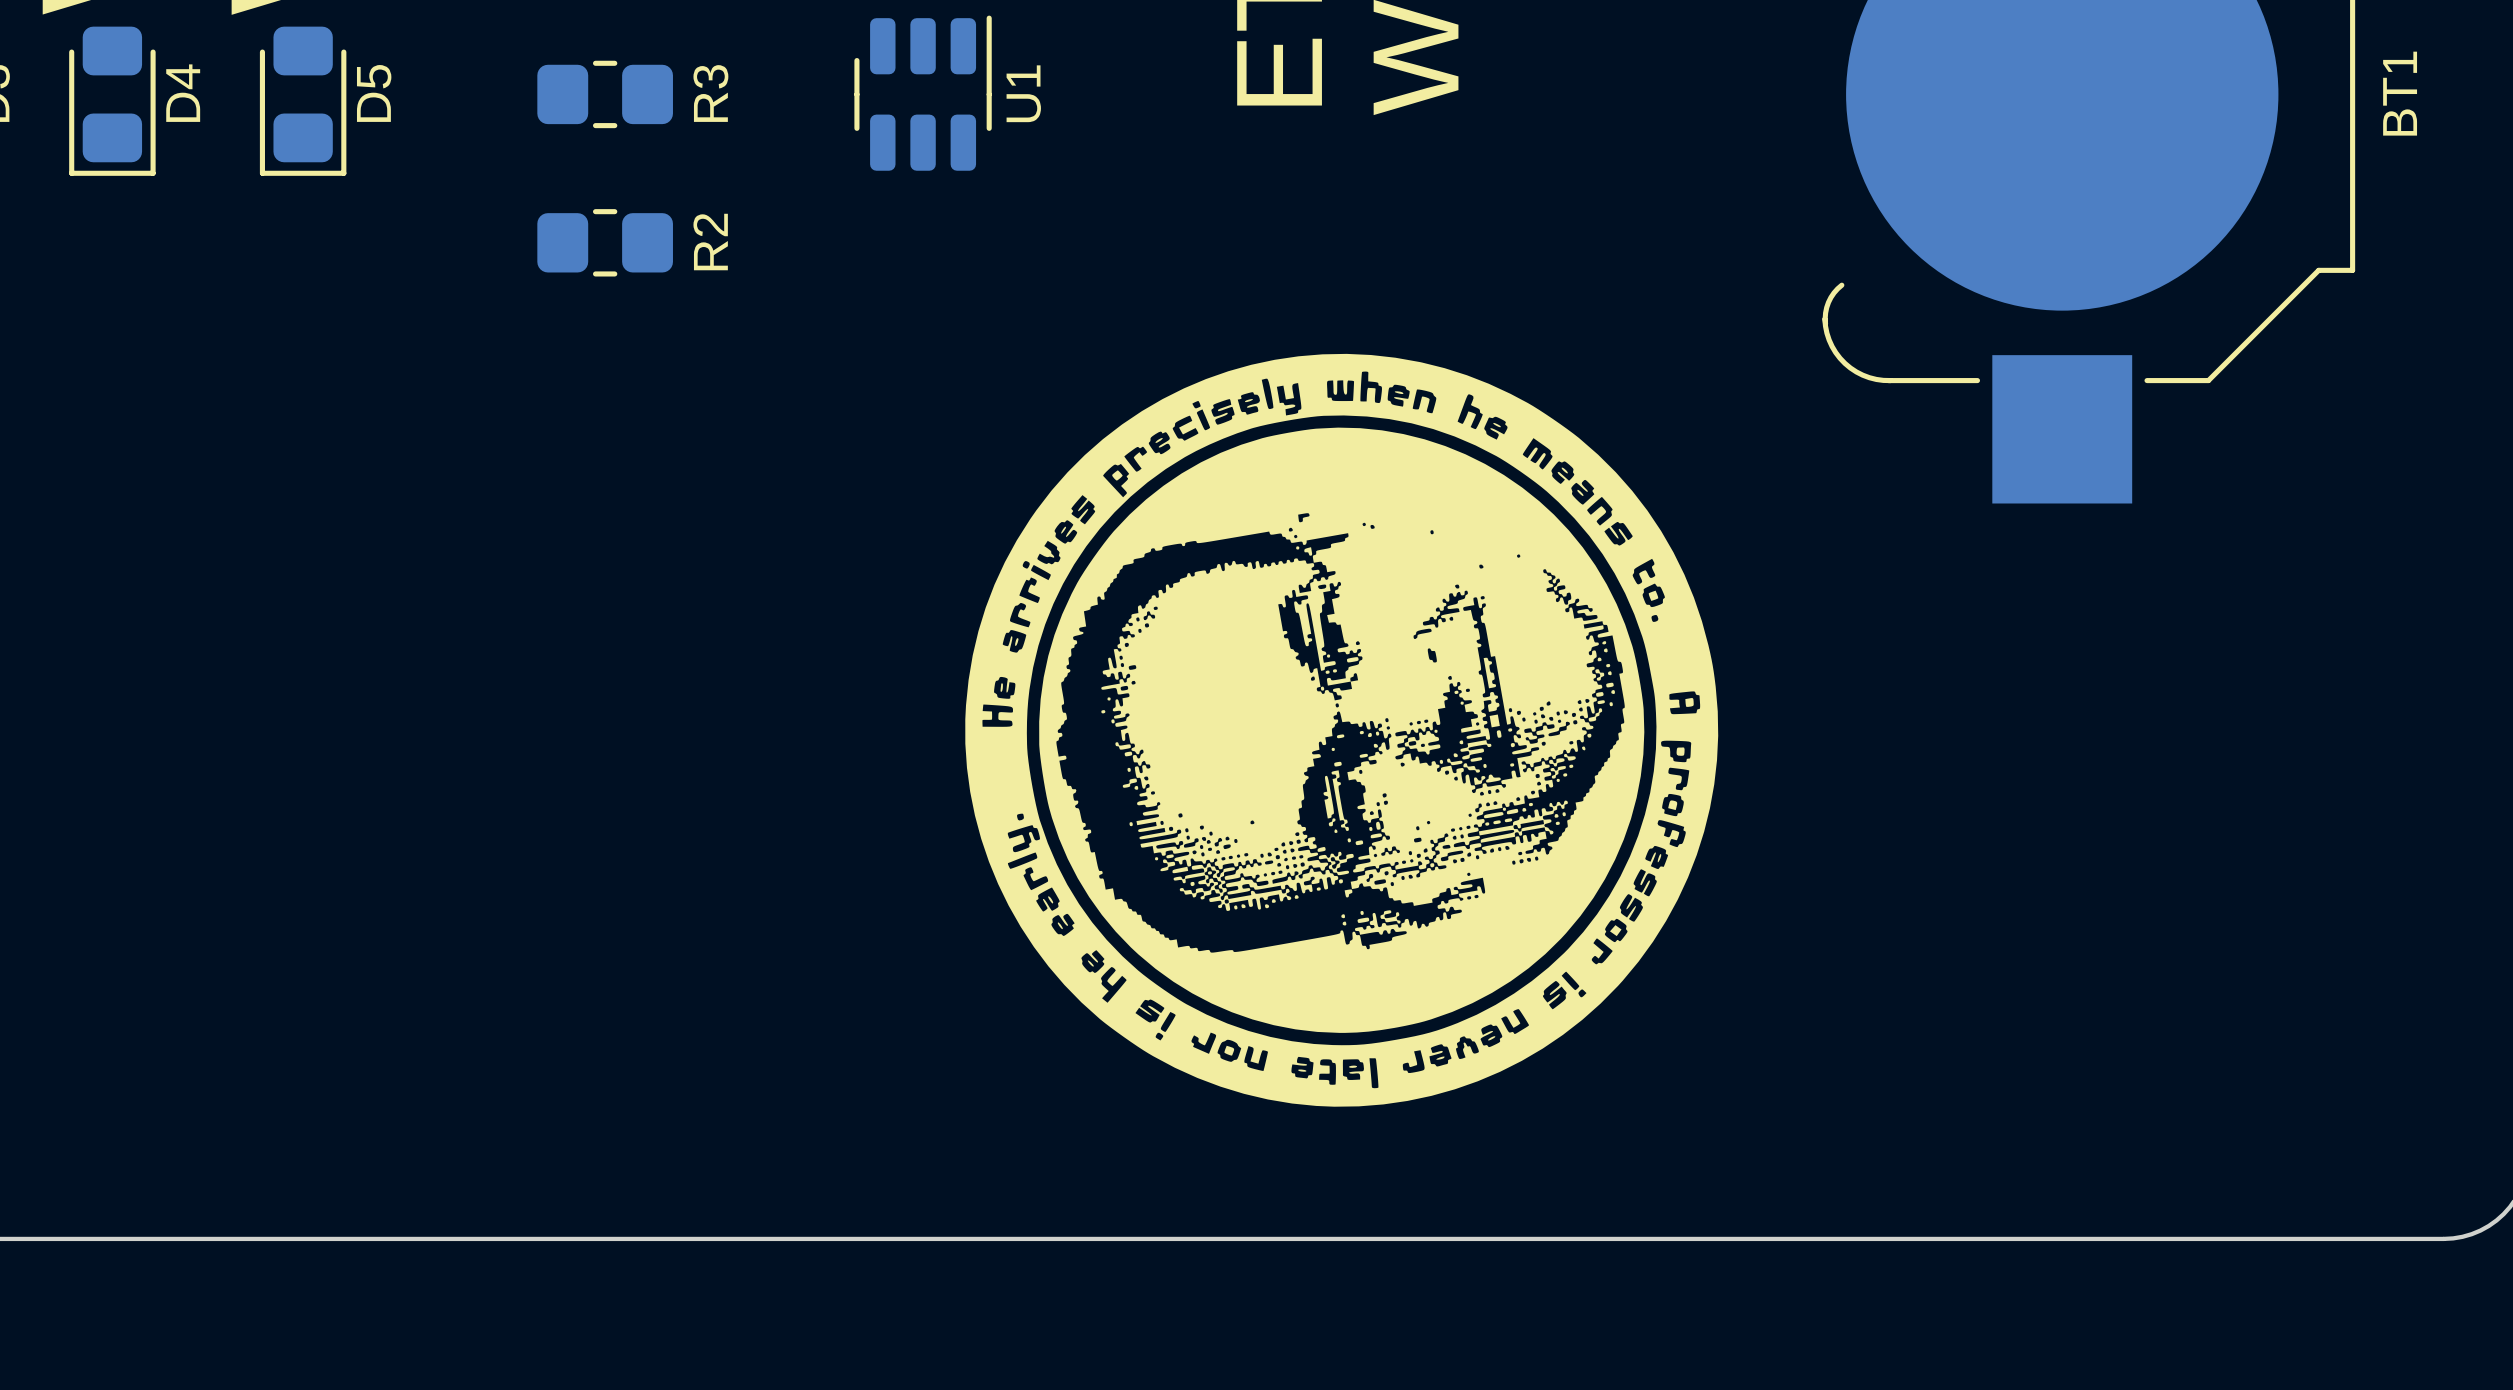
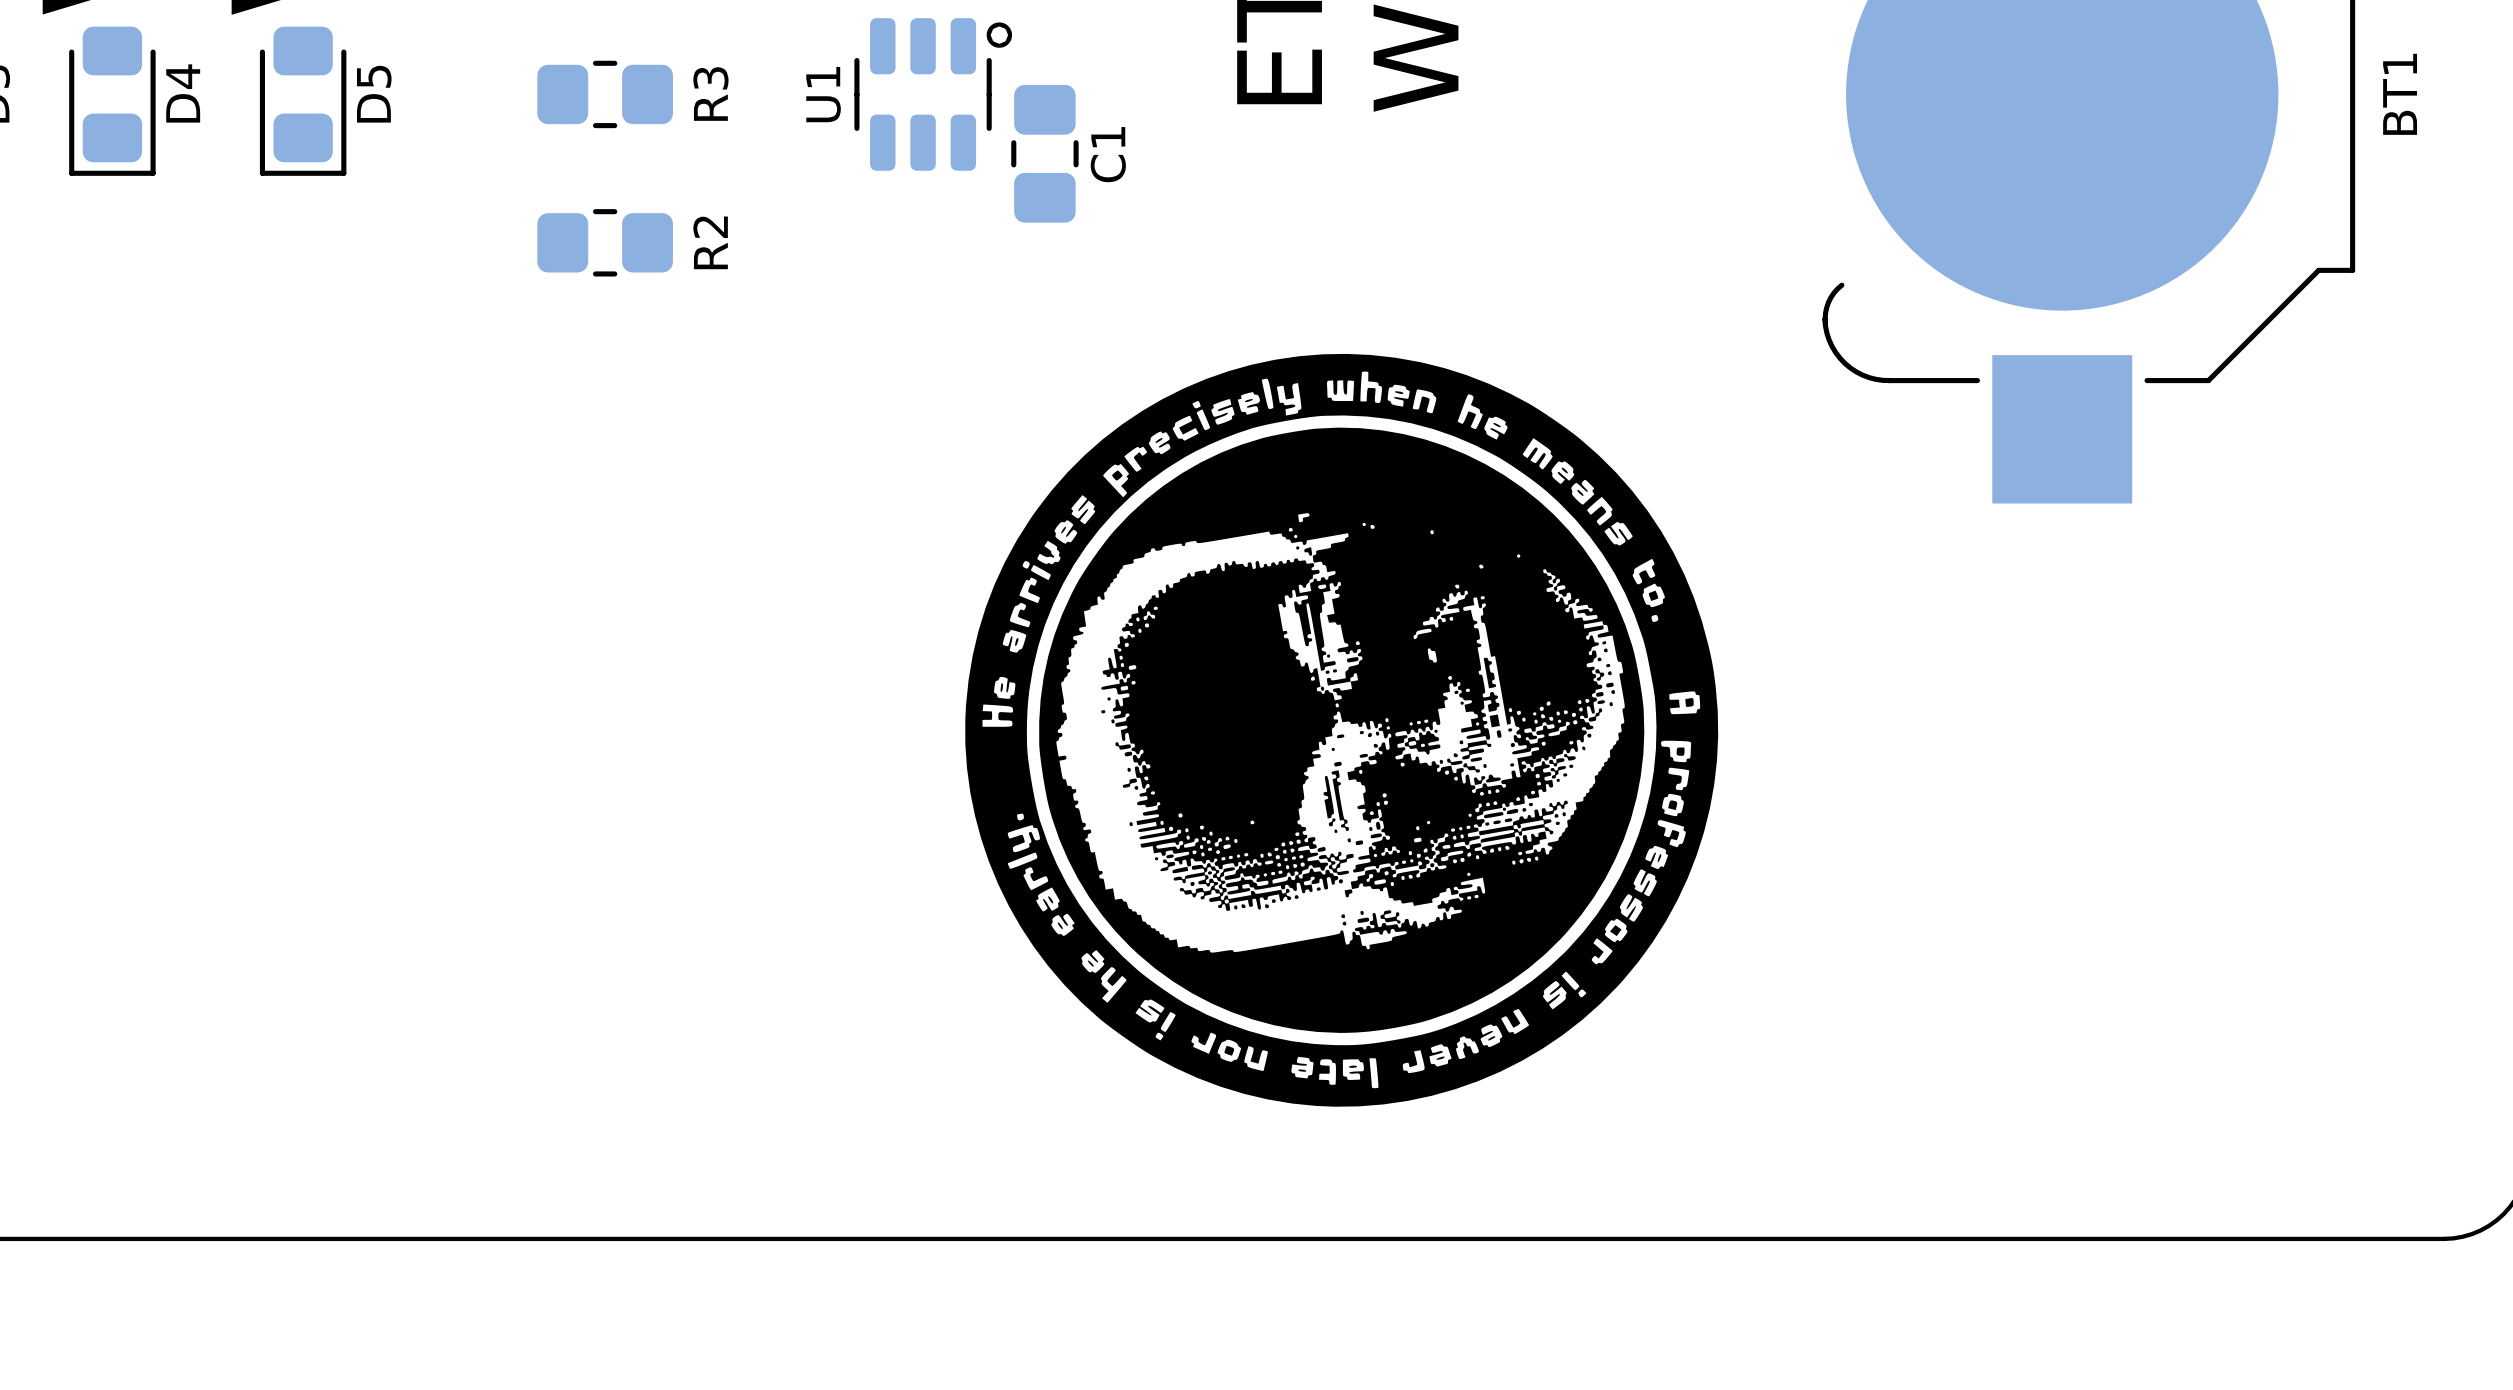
U1 footprint: [854, 15, 992, 171] -> [854, 18, 1013, 171]
U1 name position: U1 (1023, 93) -> U1 (823, 94)
C1: none -> (1044, 153)

